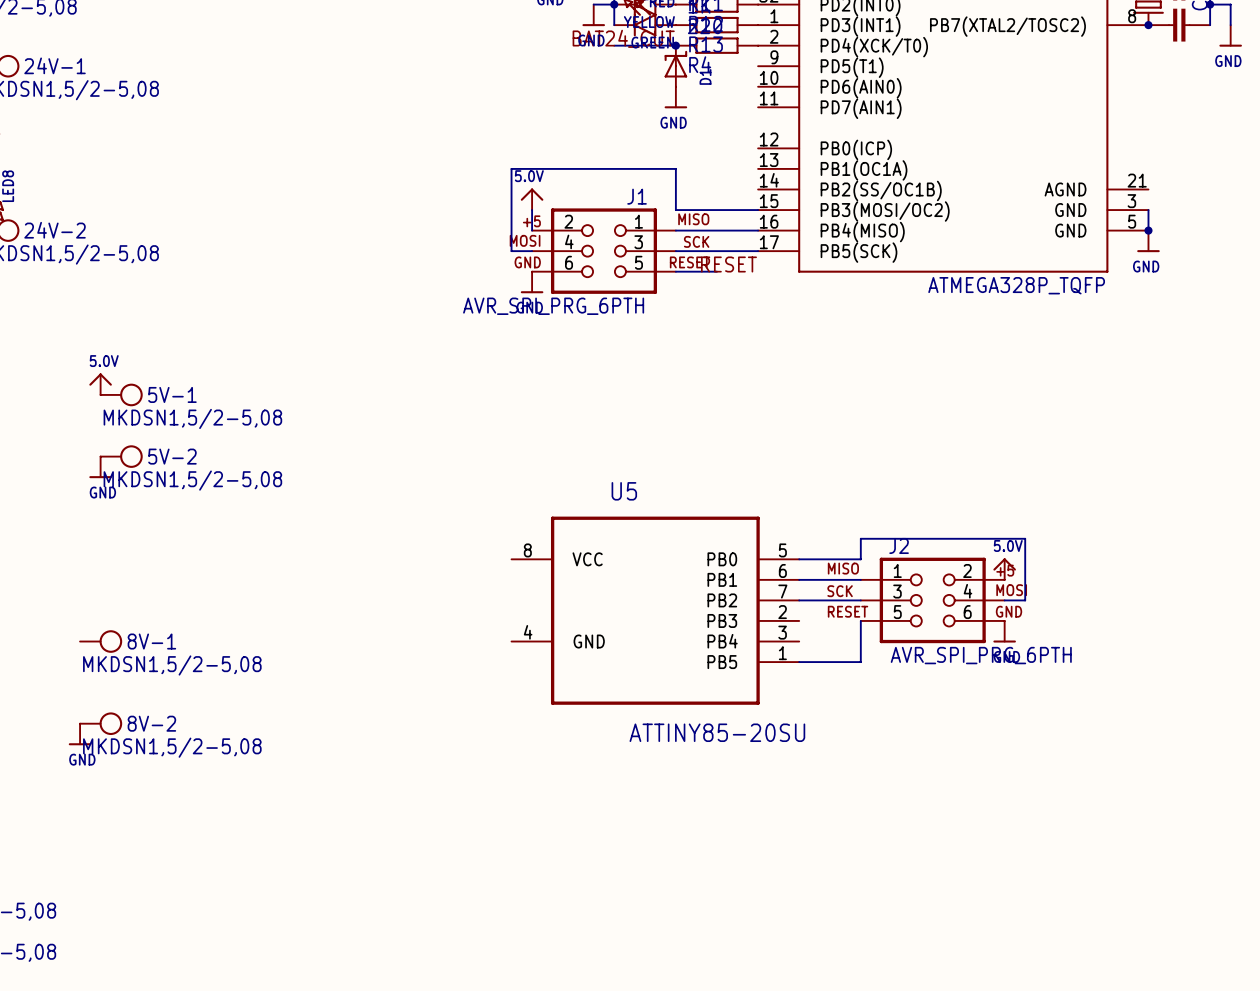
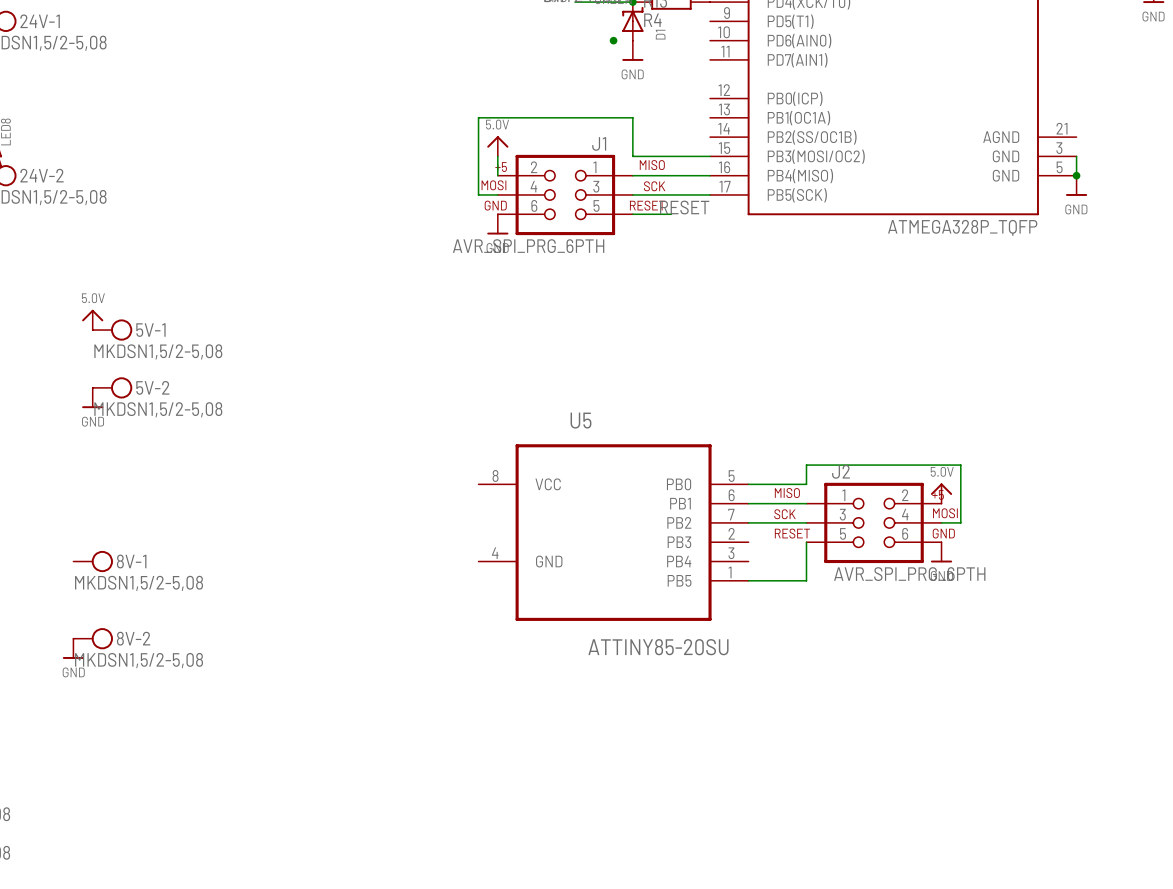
junction: none -> (613, 40)

